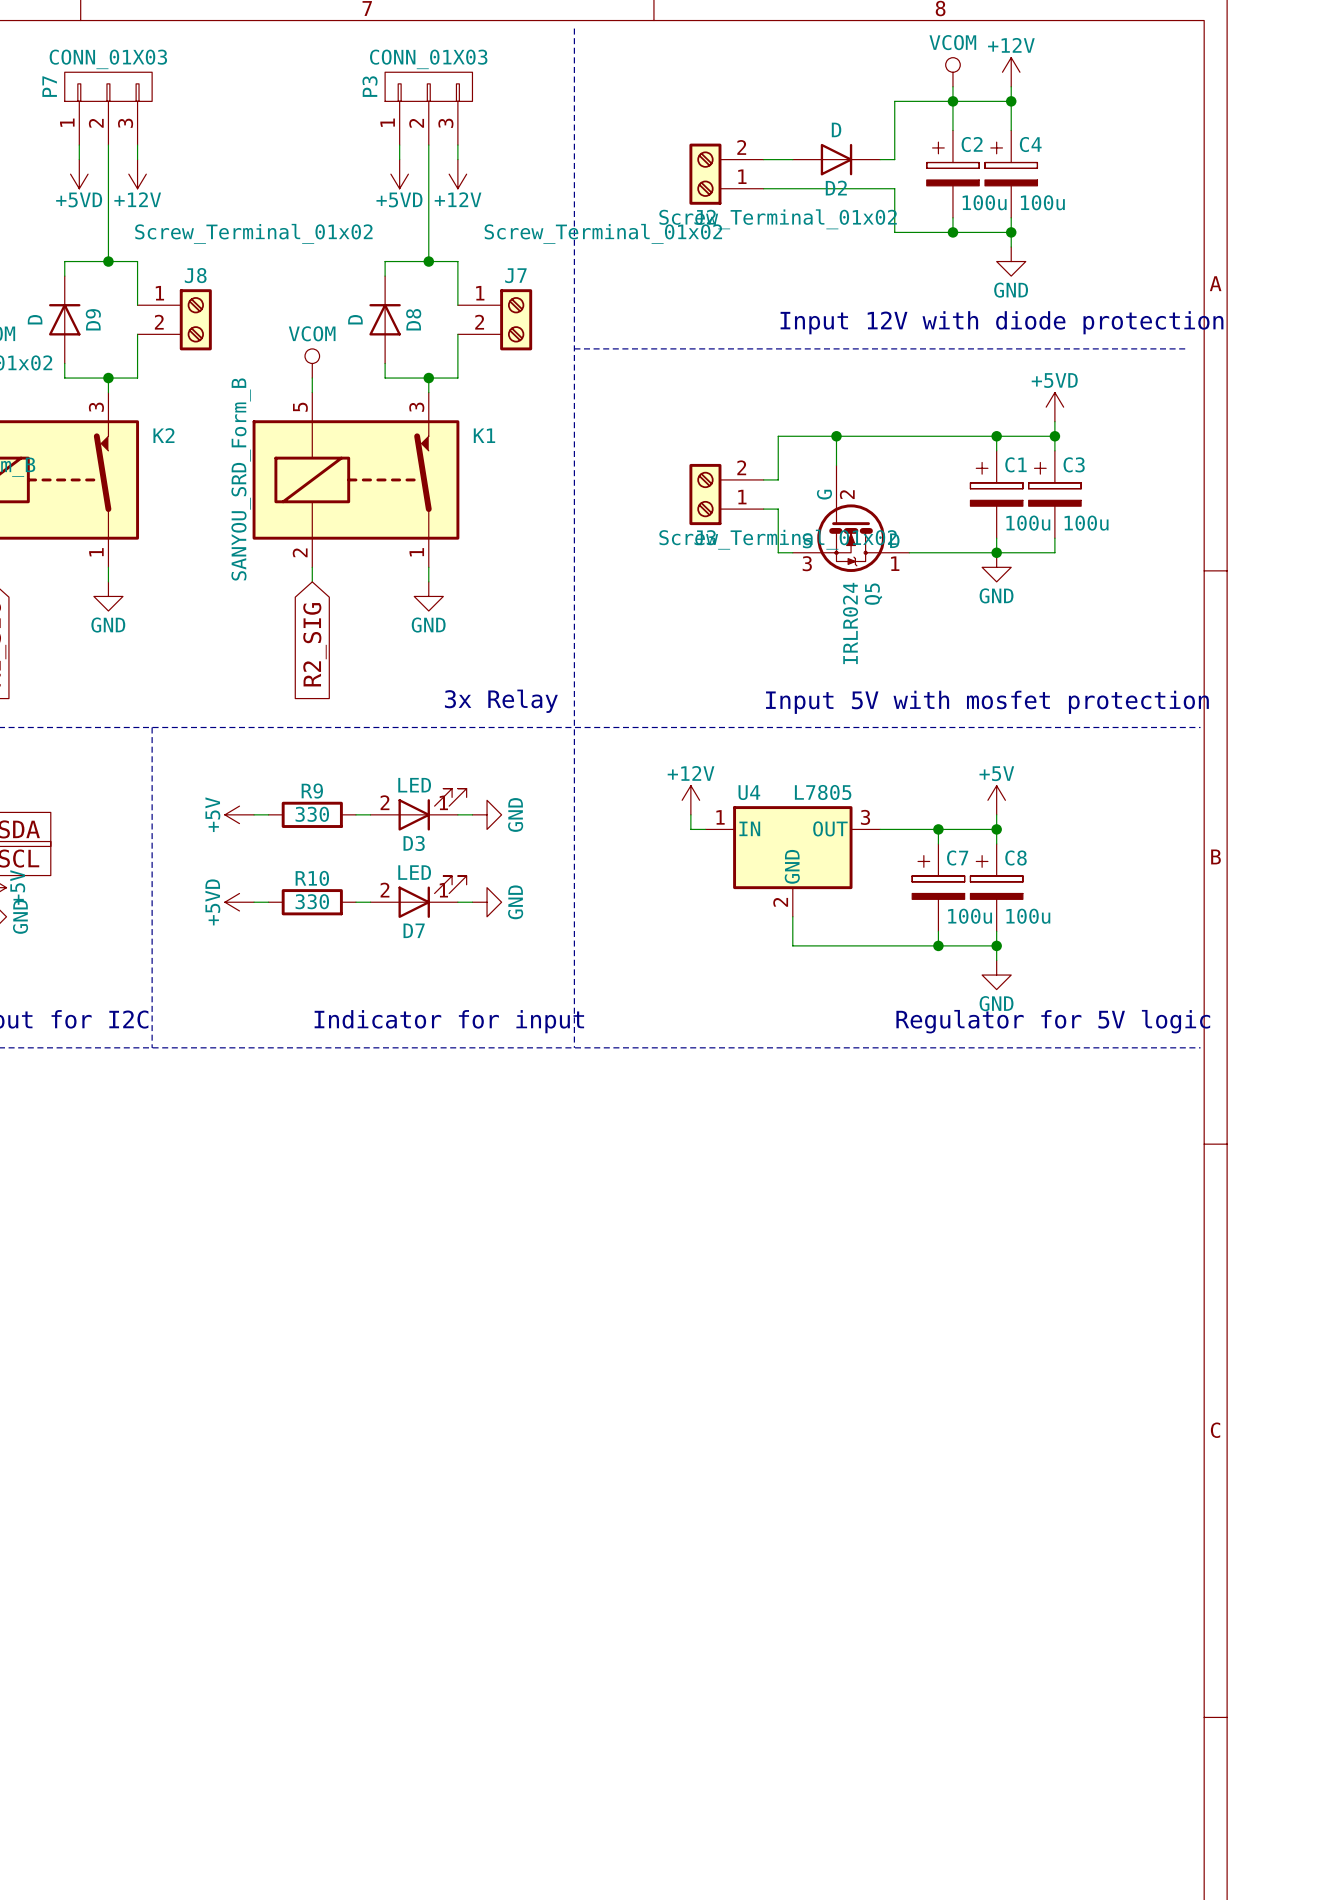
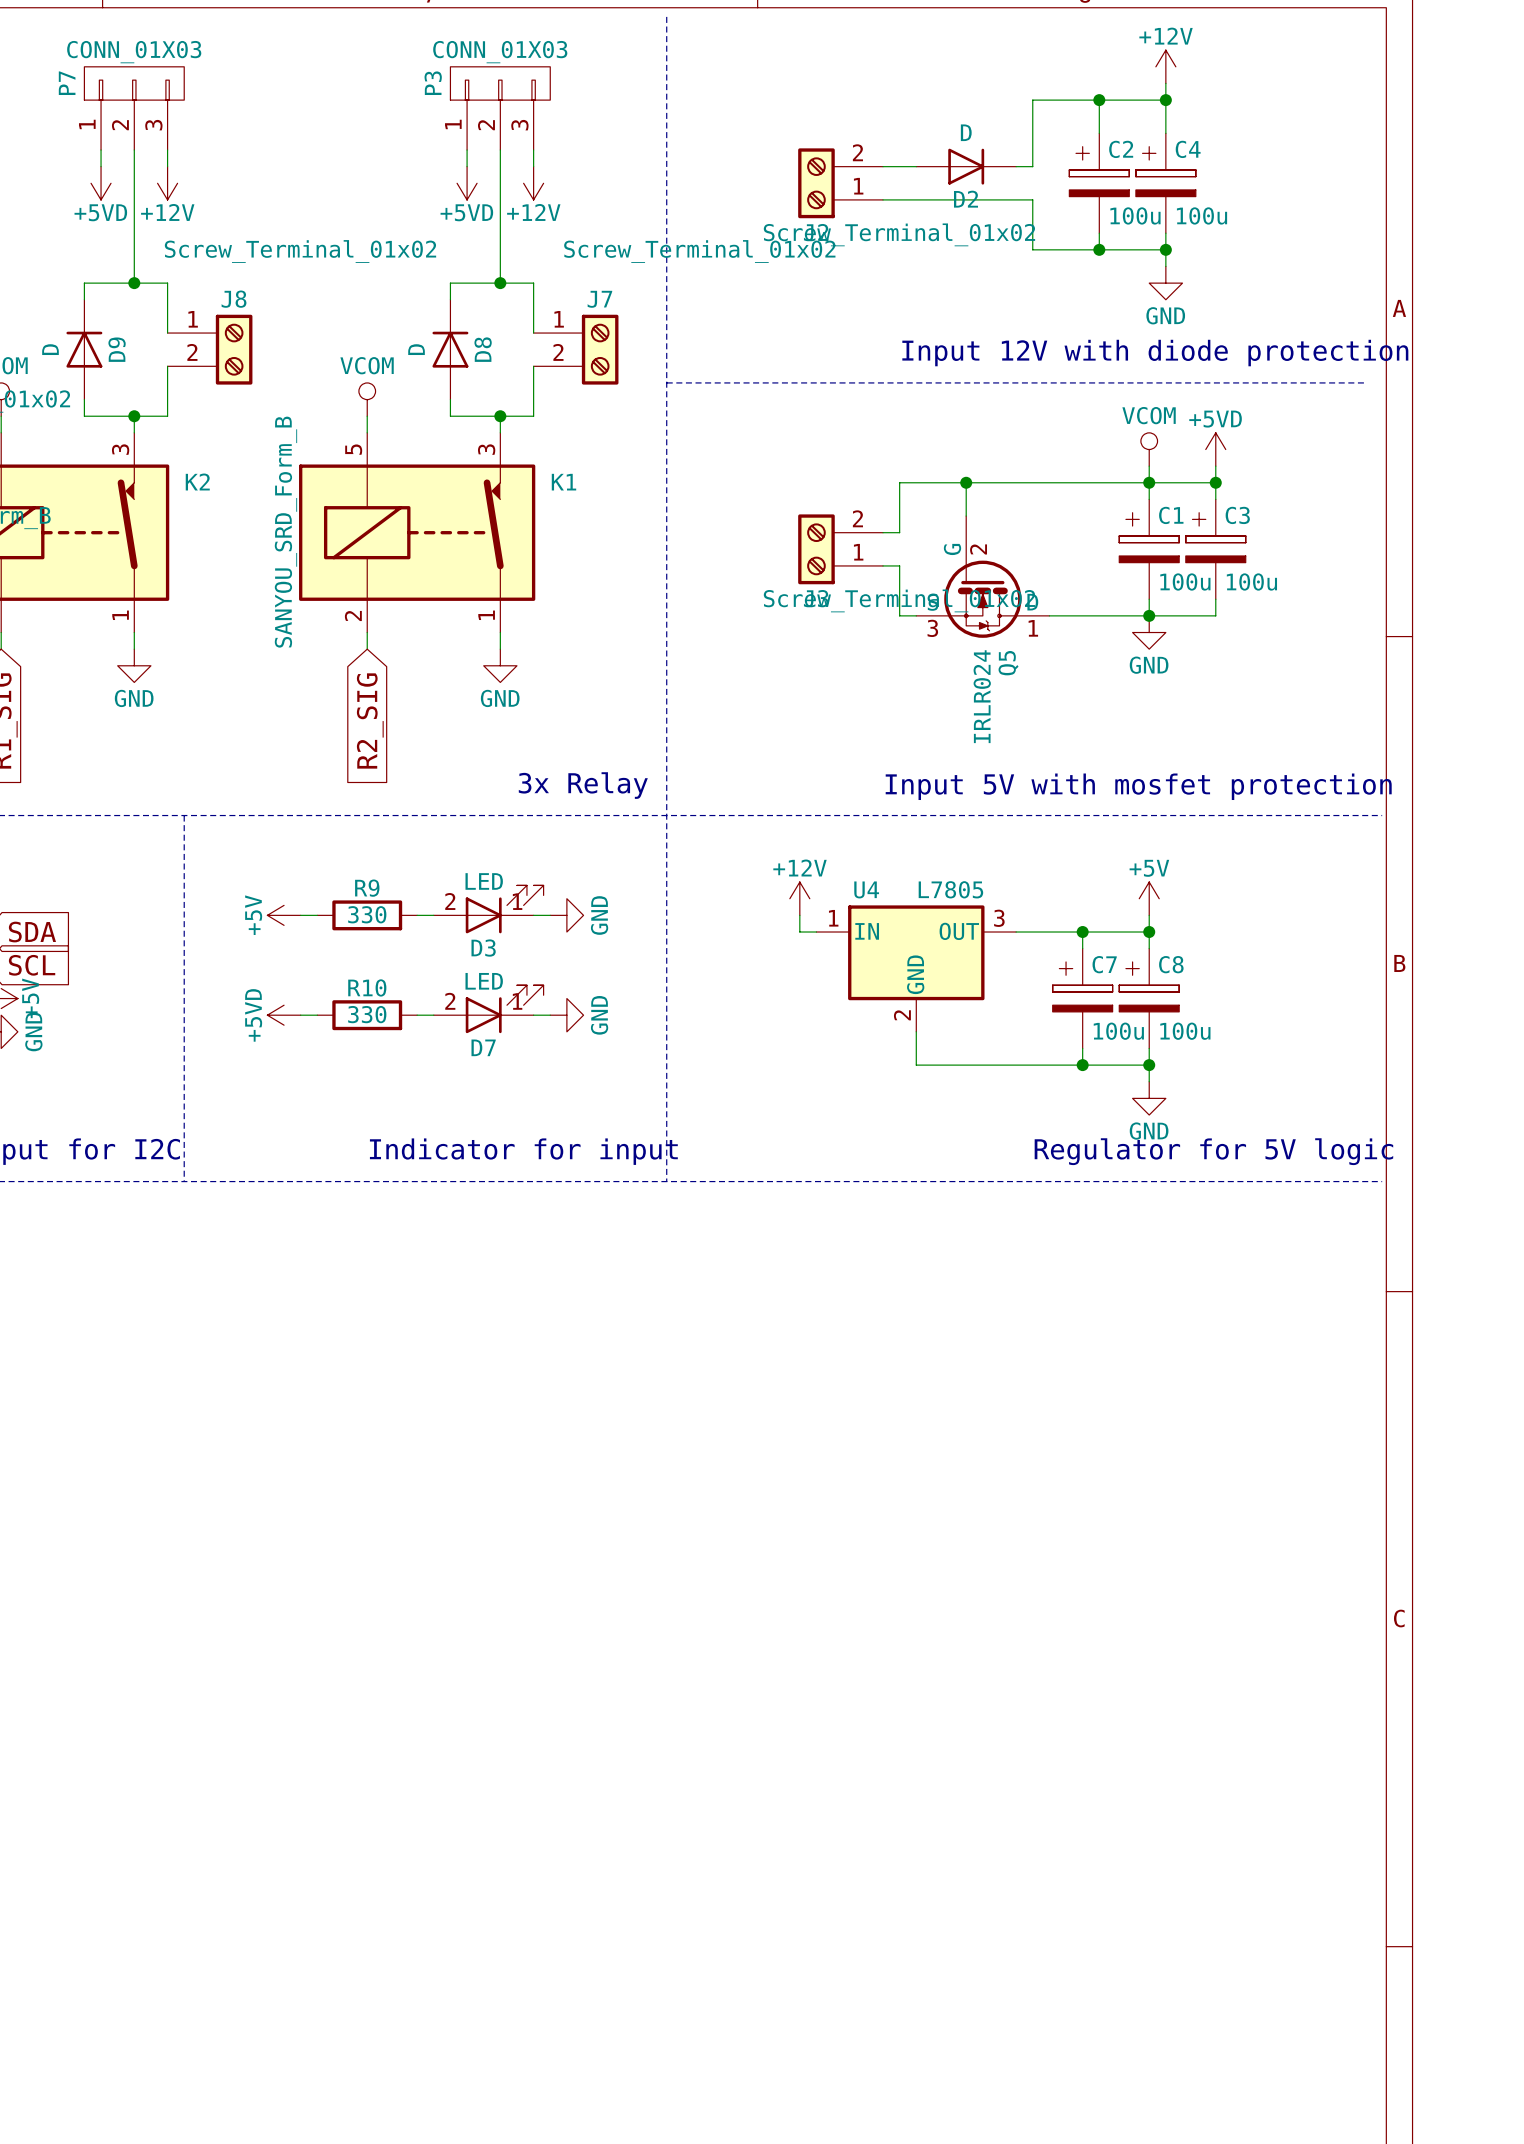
power symbol: VCOM (952, 72) -> none
wire: (952, 86) (952, 101) -> none
power symbol: none -> VCOM (1149, 449)
wire: none -> (1149, 466) (1149, 482)

